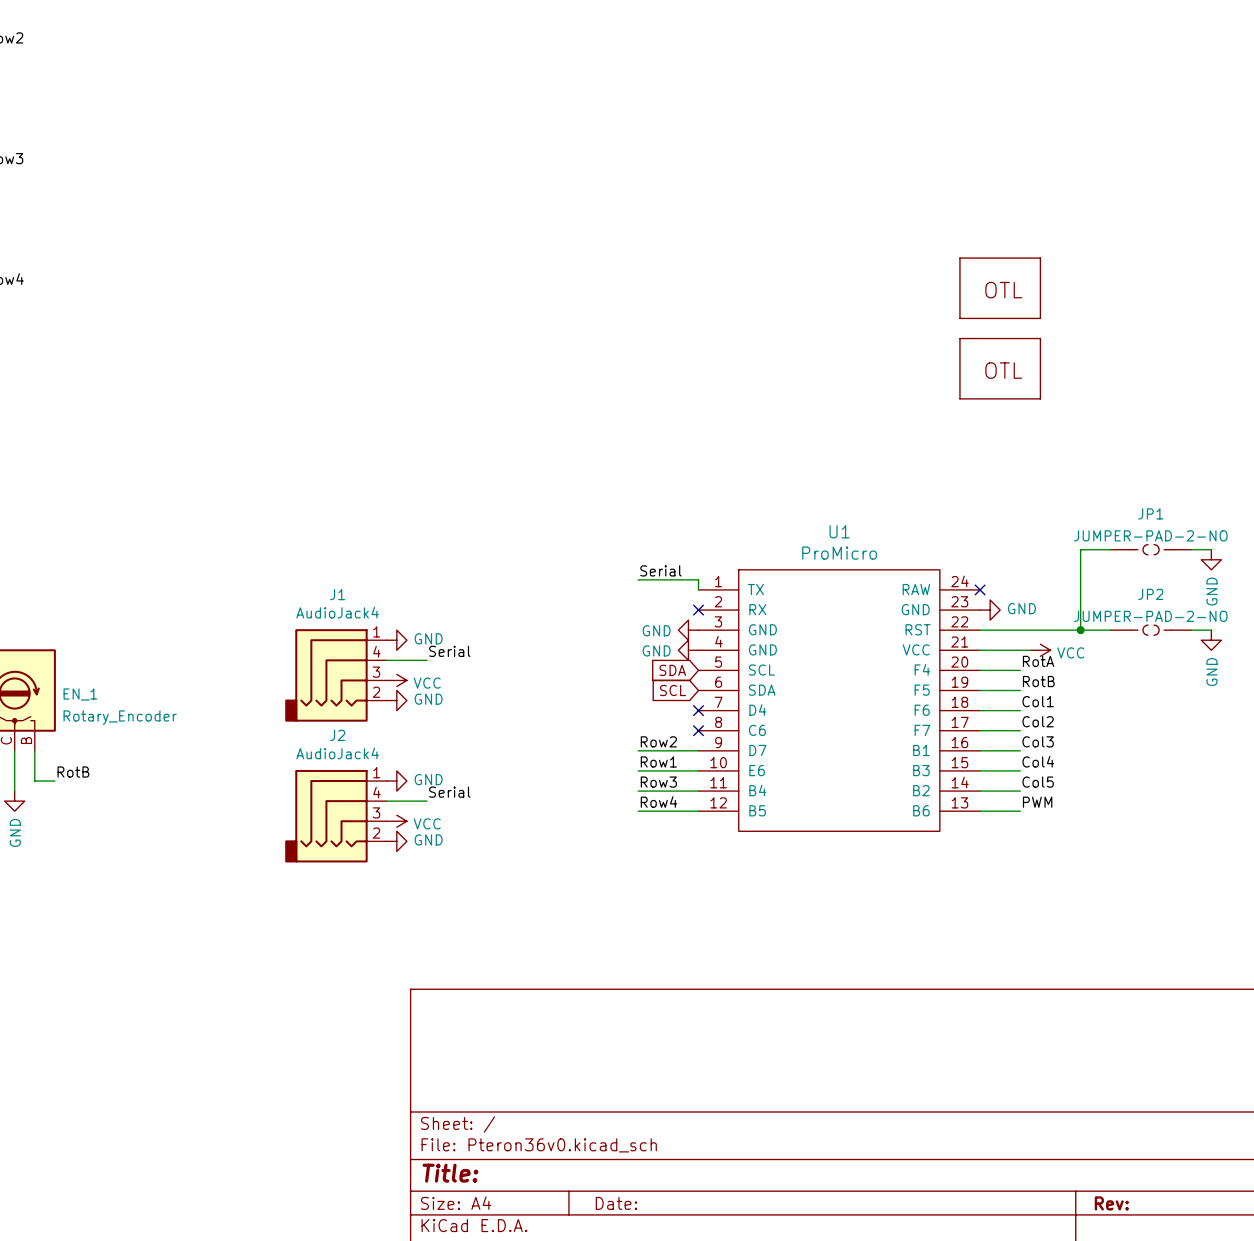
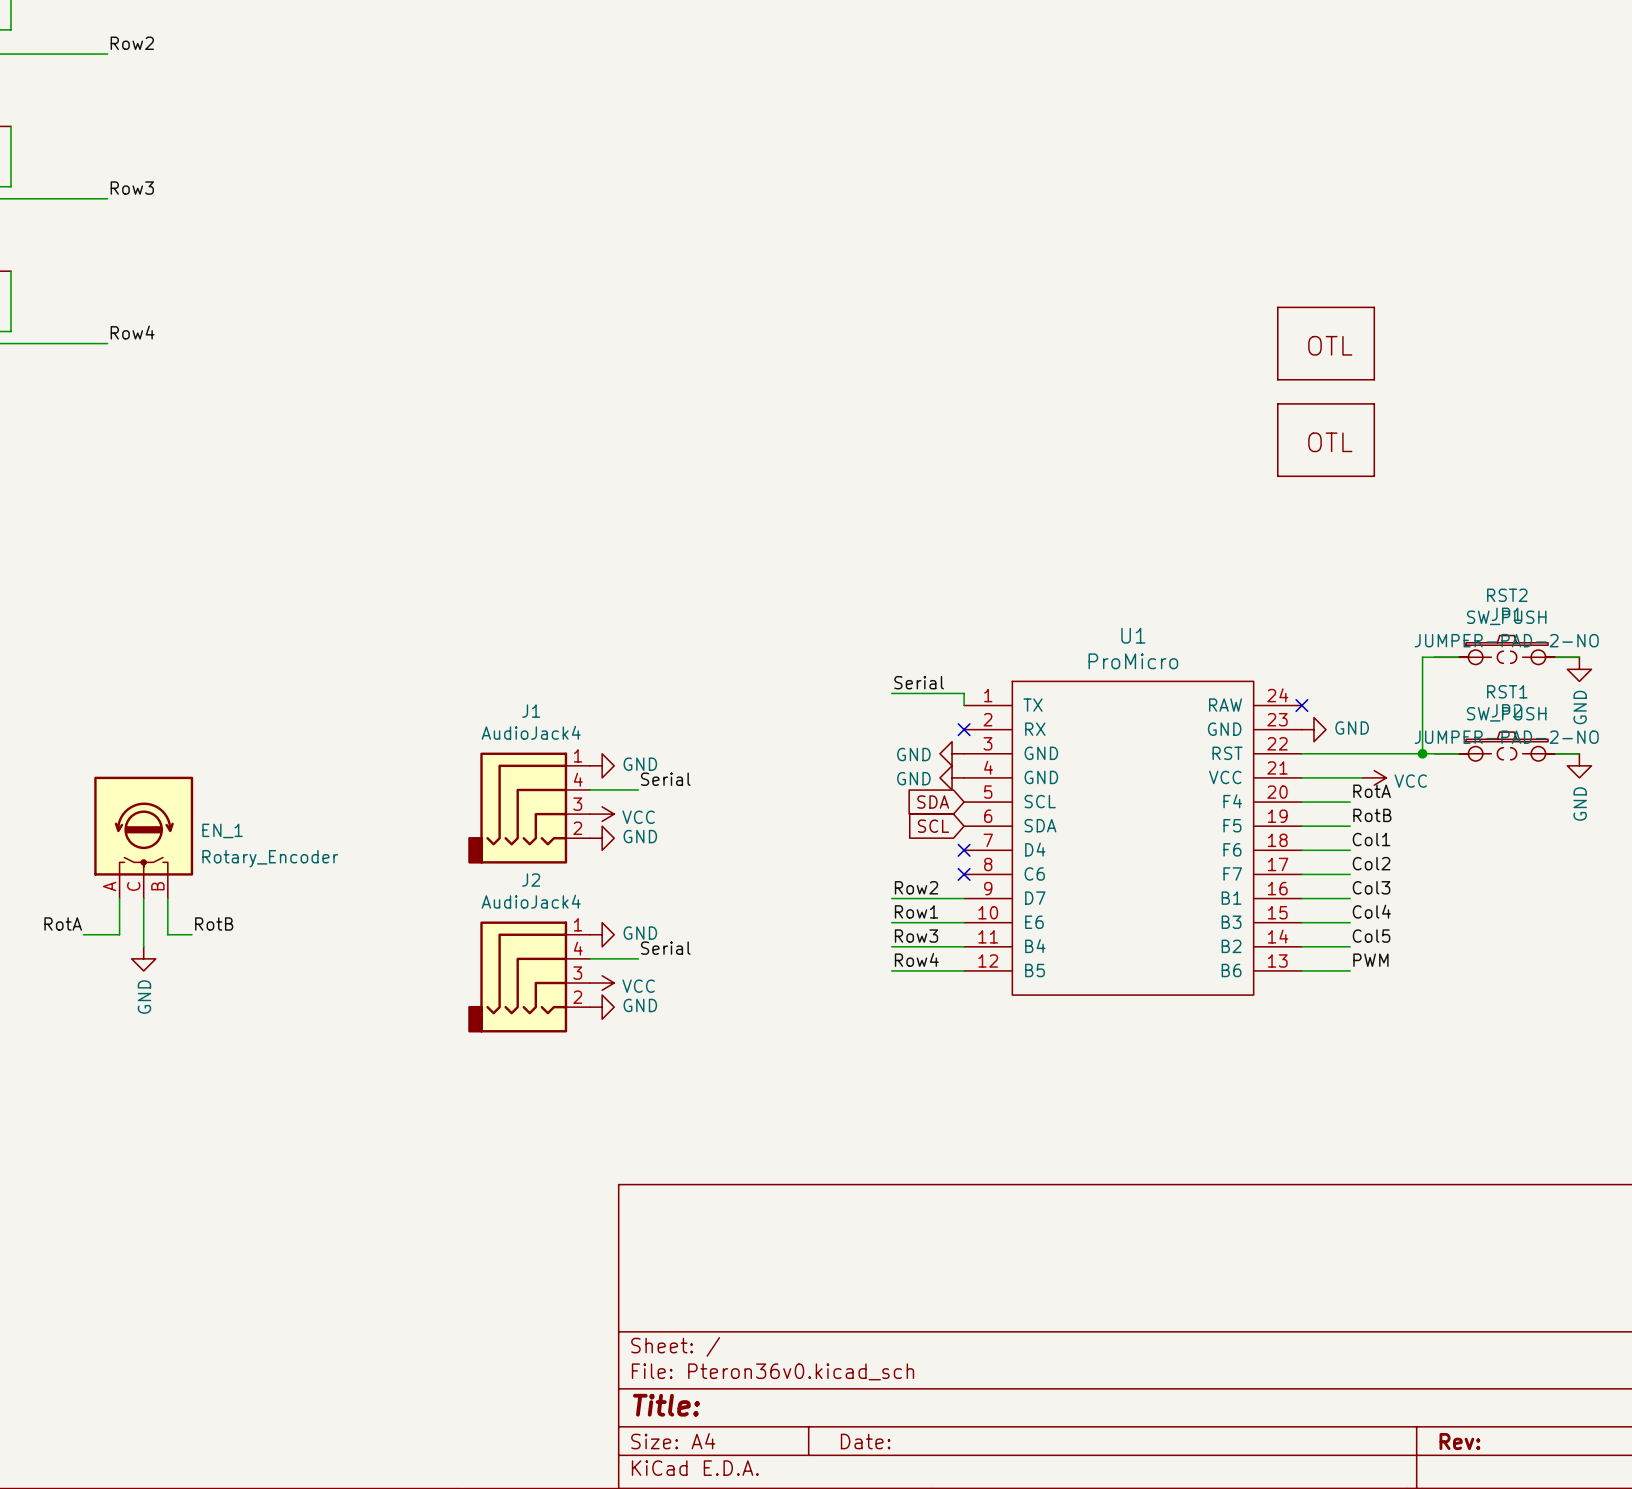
RST2: none -> SW_PUSH (1507, 650)
RST1: none -> SW_PUSH (1507, 746)

